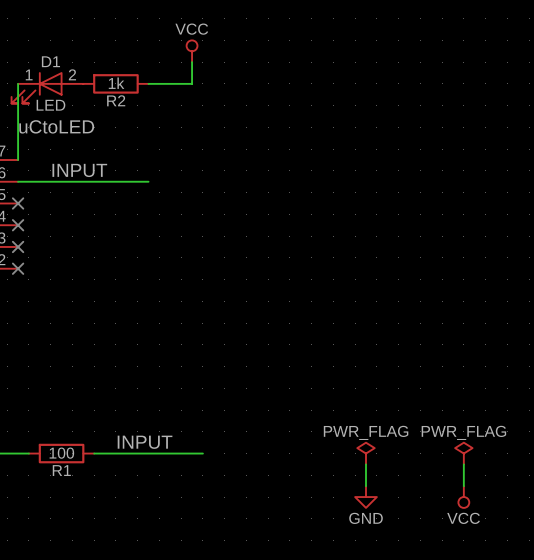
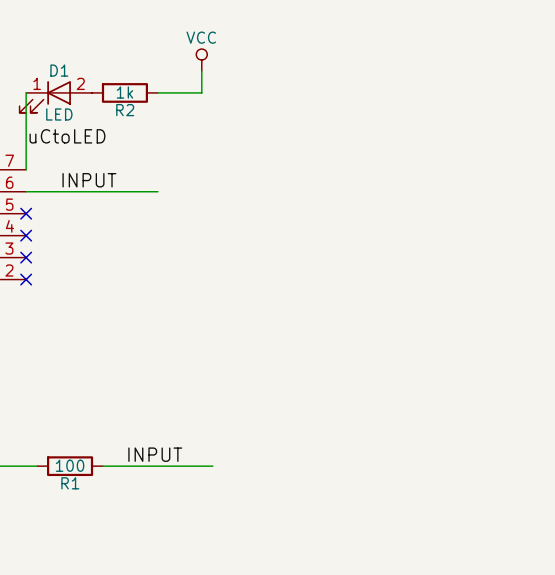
power symbol: PWR_FLAG (366, 453) -> none
power symbol: PWR_FLAG (463, 453) -> none
wire: (366, 464) (366, 486) -> none
wire: (463, 464) (463, 486) -> none
power symbol: GND (366, 497) -> none
power symbol: VCC (463, 497) -> none

